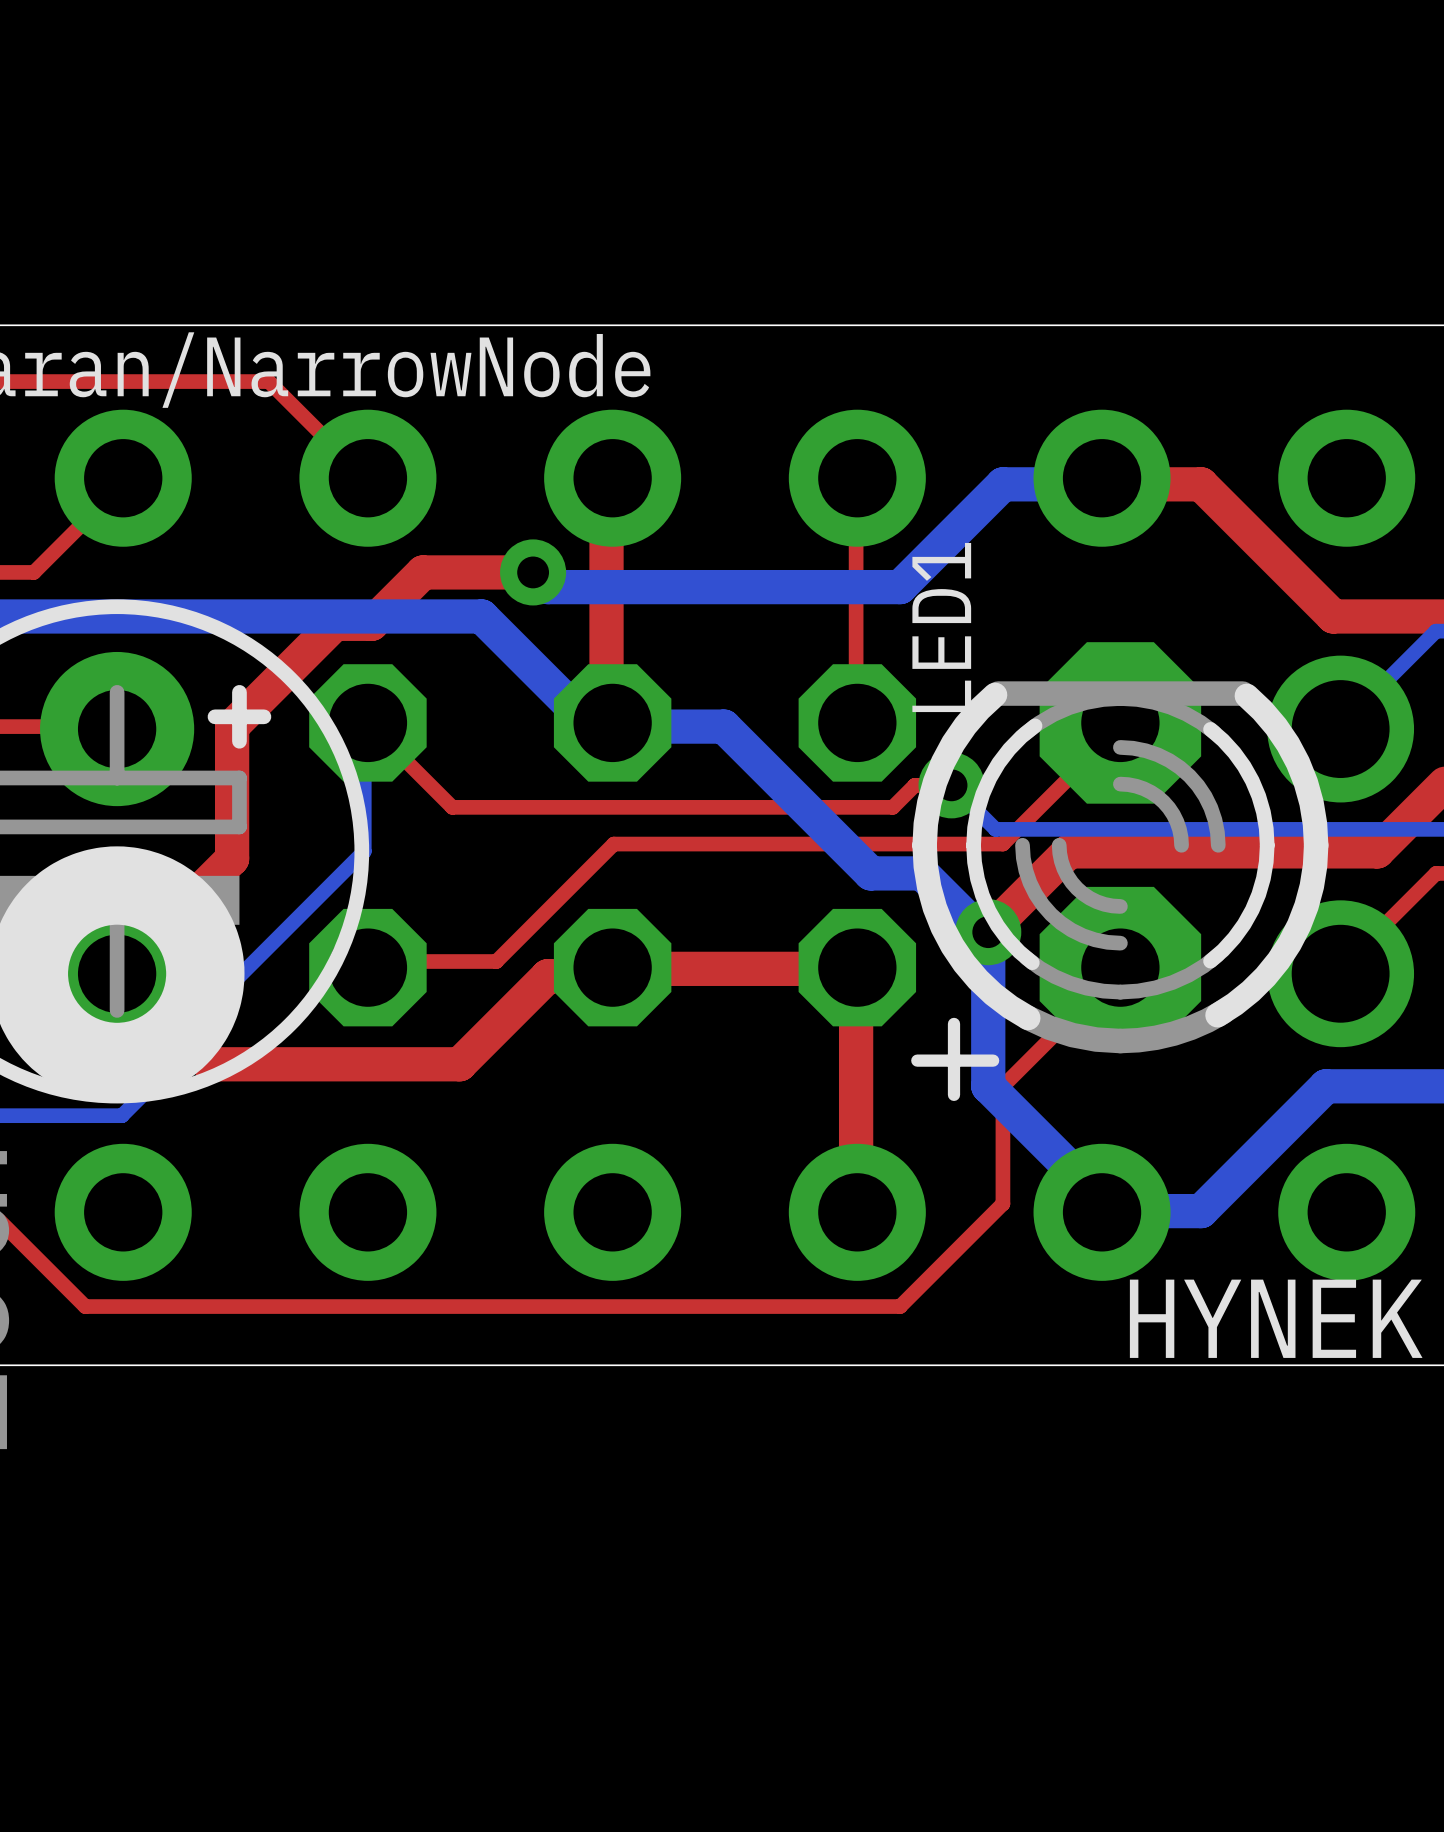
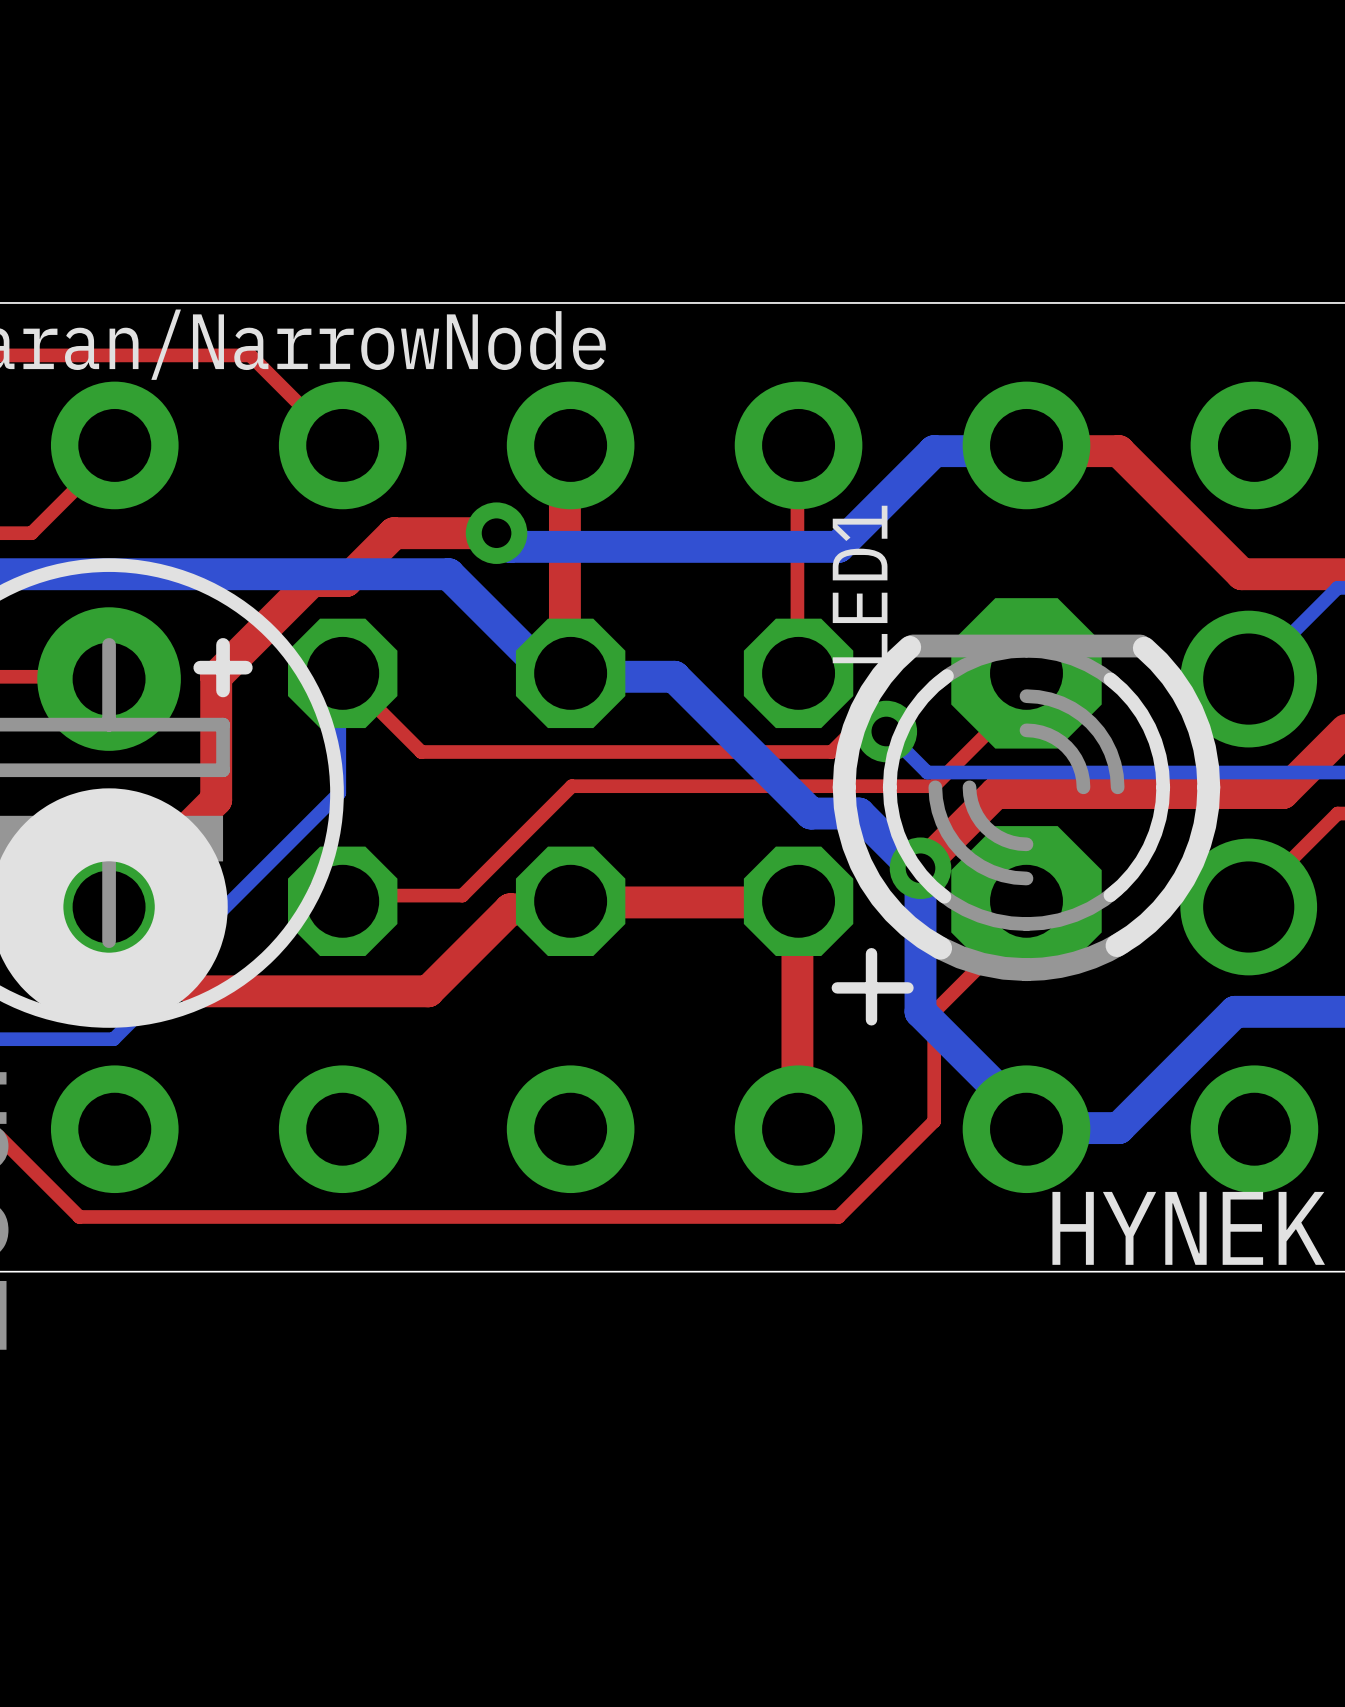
LED1 position: (1119, 871) -> (1025, 811)

